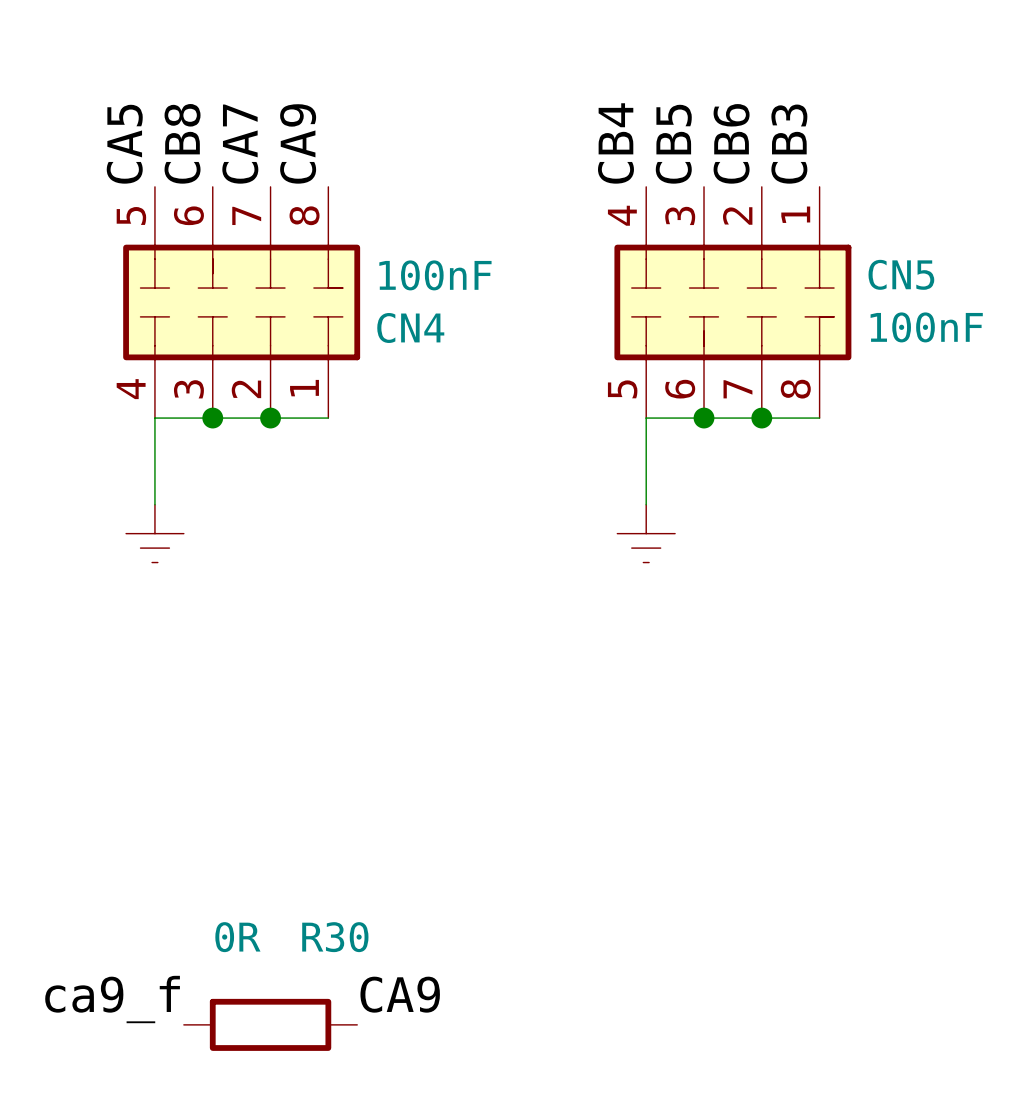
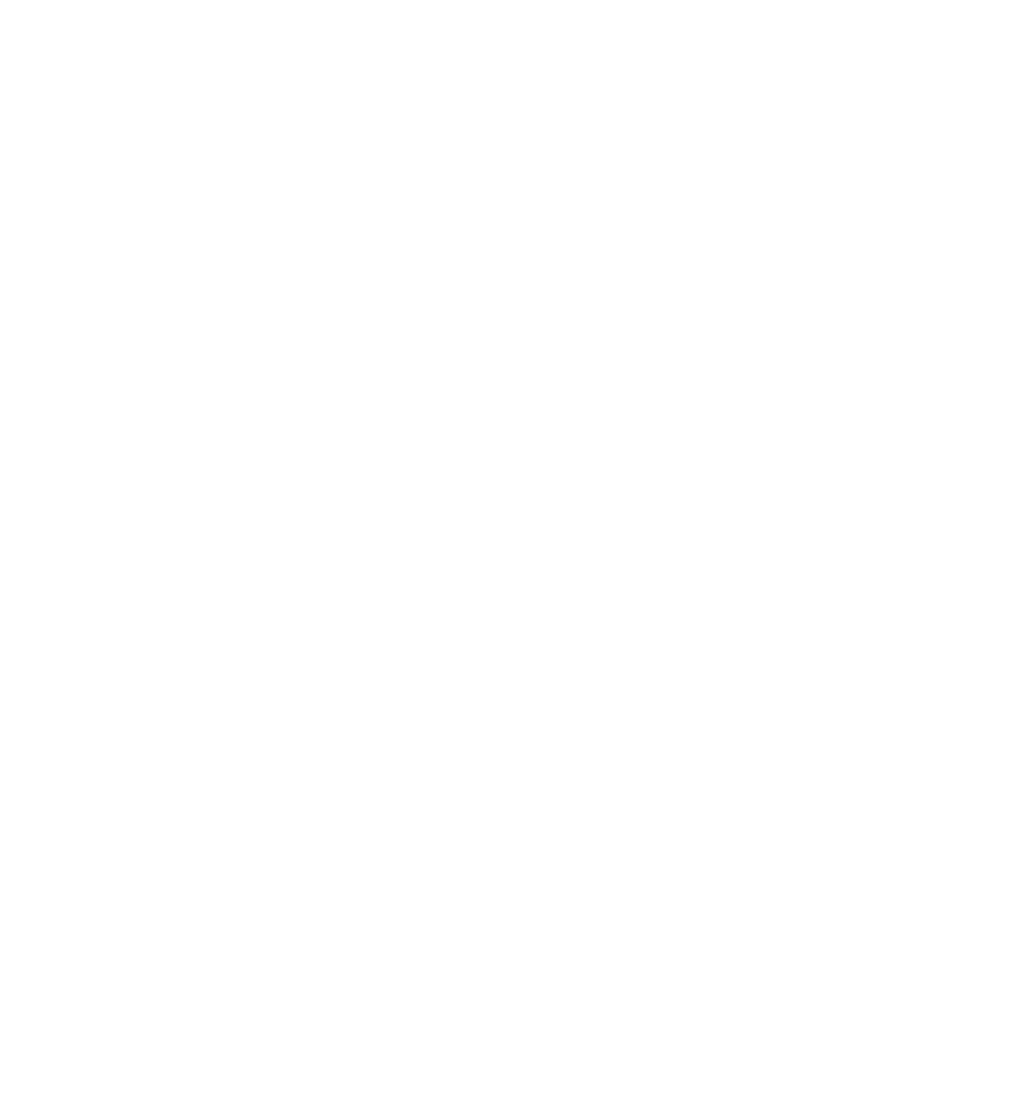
label: CB8 (182, 143) -> none
label: CA9 (298, 143) -> none
label: CB4 (615, 143) -> none
label: CB6 (731, 143) -> none
label: CA5 (124, 144) -> none
label: CA7 (240, 144) -> none
label: CB5 (673, 144) -> none
label: CB3 (789, 144) -> none
CN4: 100nF (241, 302) -> none
CN5: 100nF (732, 302) -> none
junction: (212, 418) -> none
junction: (270, 418) -> none
wire: (328, 418) (154, 418) (154, 504) -> none
junction: (704, 418) -> none
junction: (761, 418) -> none
wire: (819, 418) (646, 418) (646, 504) -> none
power symbol: (154, 533) -> none
power symbol: (646, 533) -> none
label: CA9 (400, 994) -> none
label: ca9_f (112, 999) -> none
R30: 0R (270, 1024) -> none

